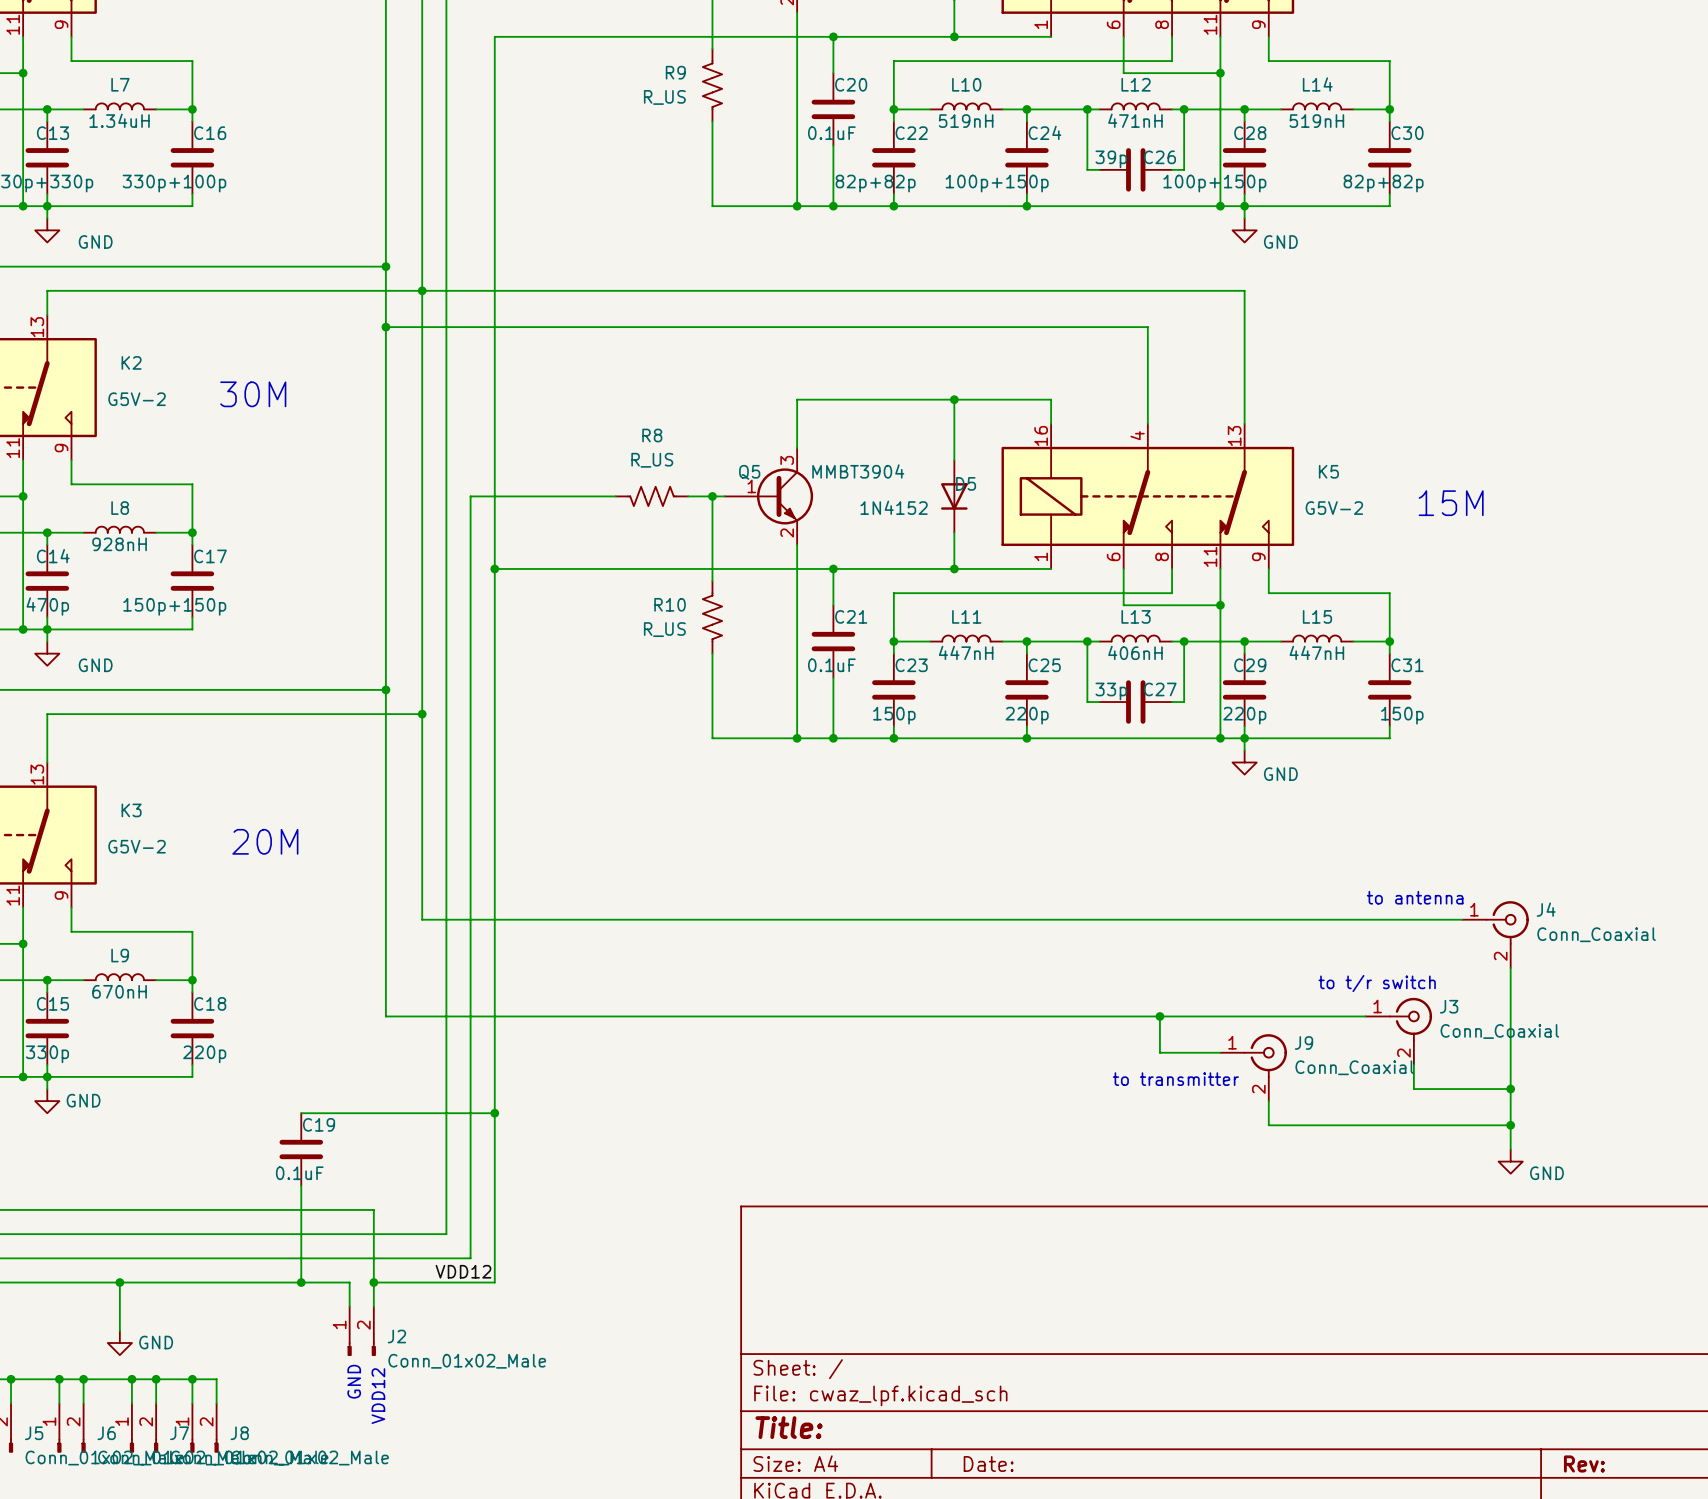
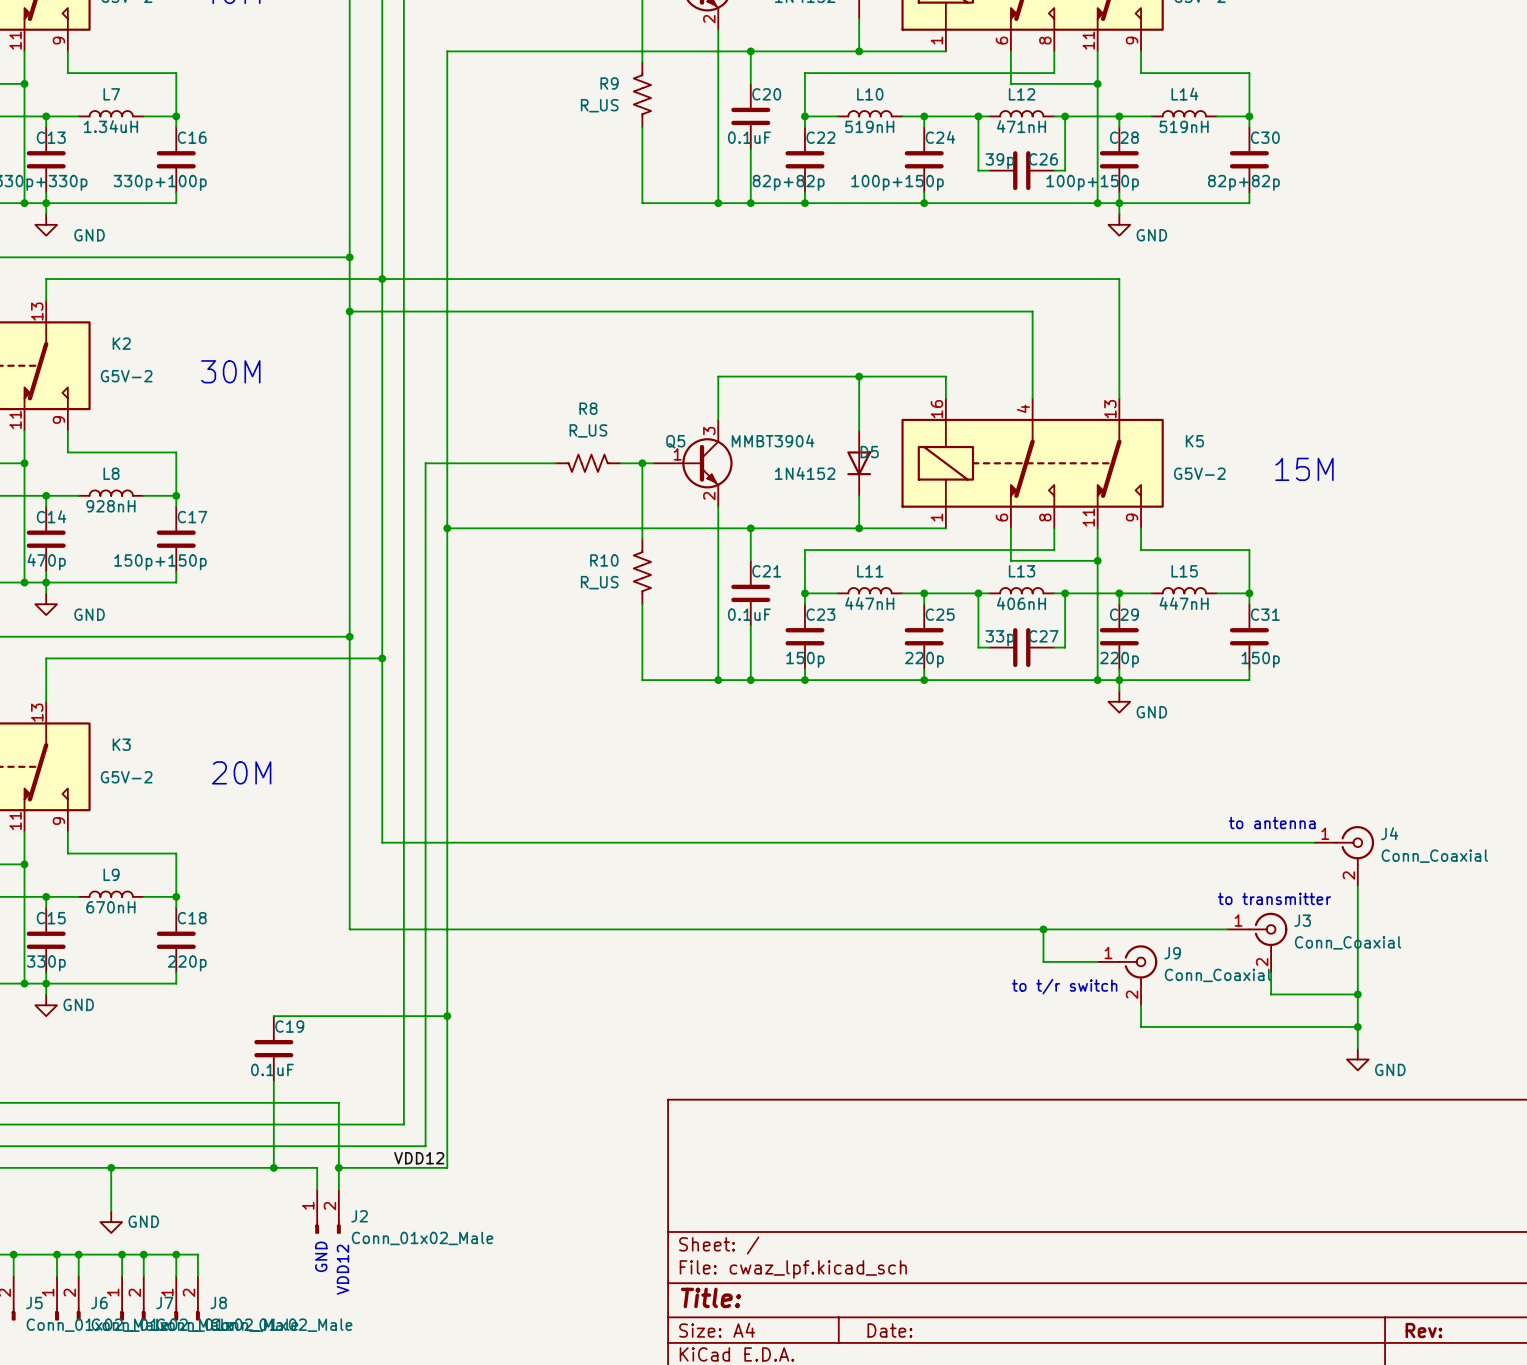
text: none -> to transmitter (1274, 898)
text position: to t/r switch (1377, 983) -> to t/r switch (1064, 986)
text: to transmitter (1175, 1079) -> none

